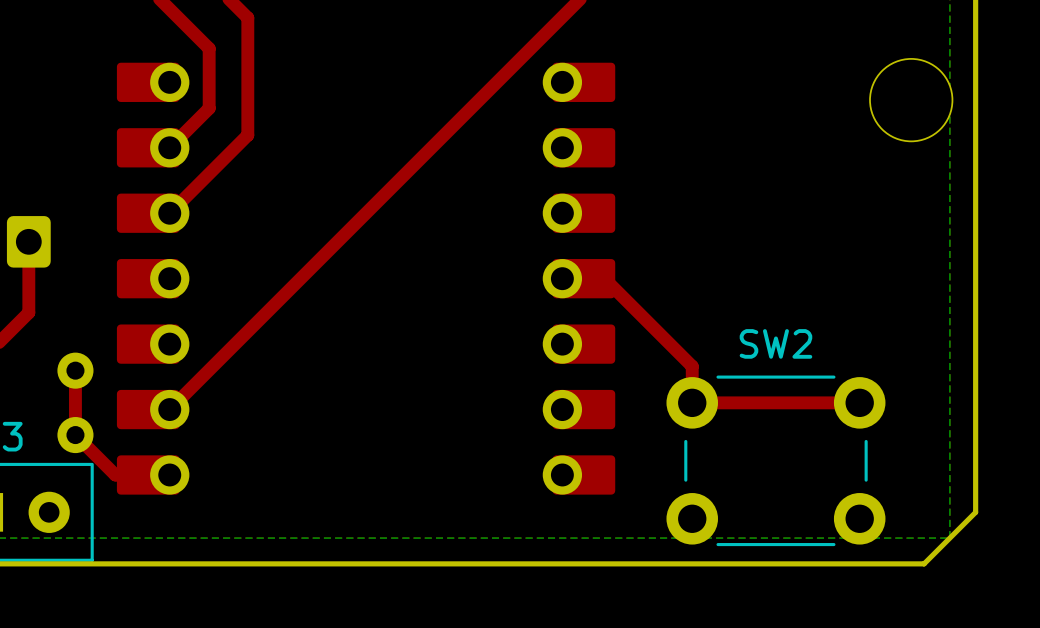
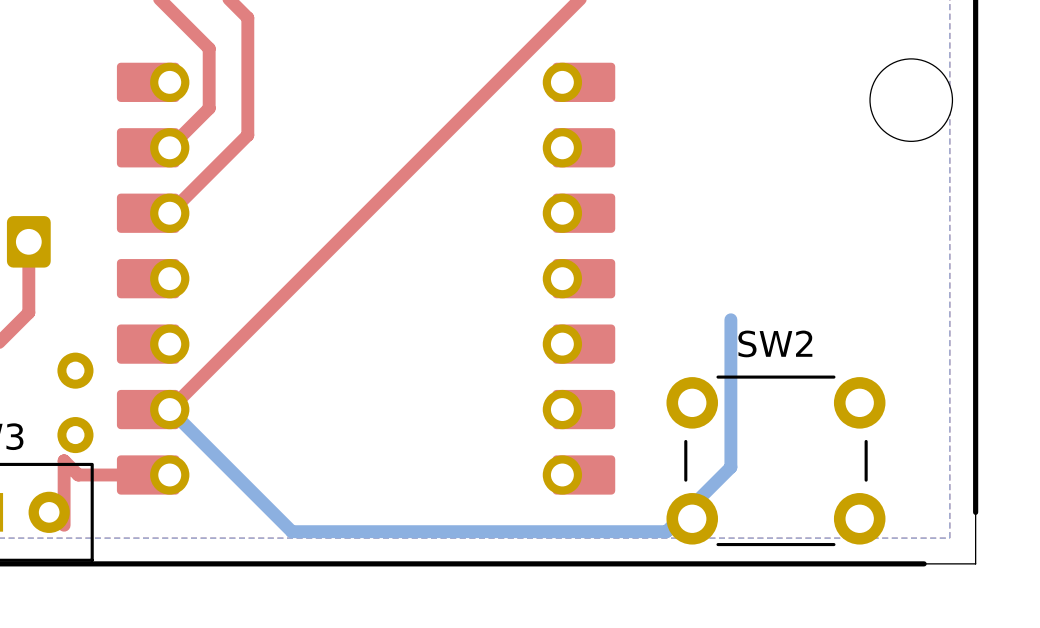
top track: (562, 278) (604, 278) (692, 366) (692, 402) (859, 402) -> none
bottom track: none -> (730, 319) (730, 467) (666, 531) (291, 531) (169, 409)
top track: (75, 370) (75, 435) (115, 474) -> (64, 525) (64, 460) (78, 474) (115, 474)
board edge: (975, 512) (924, 563) -> (975, 512) (975, 563) (924, 563)

